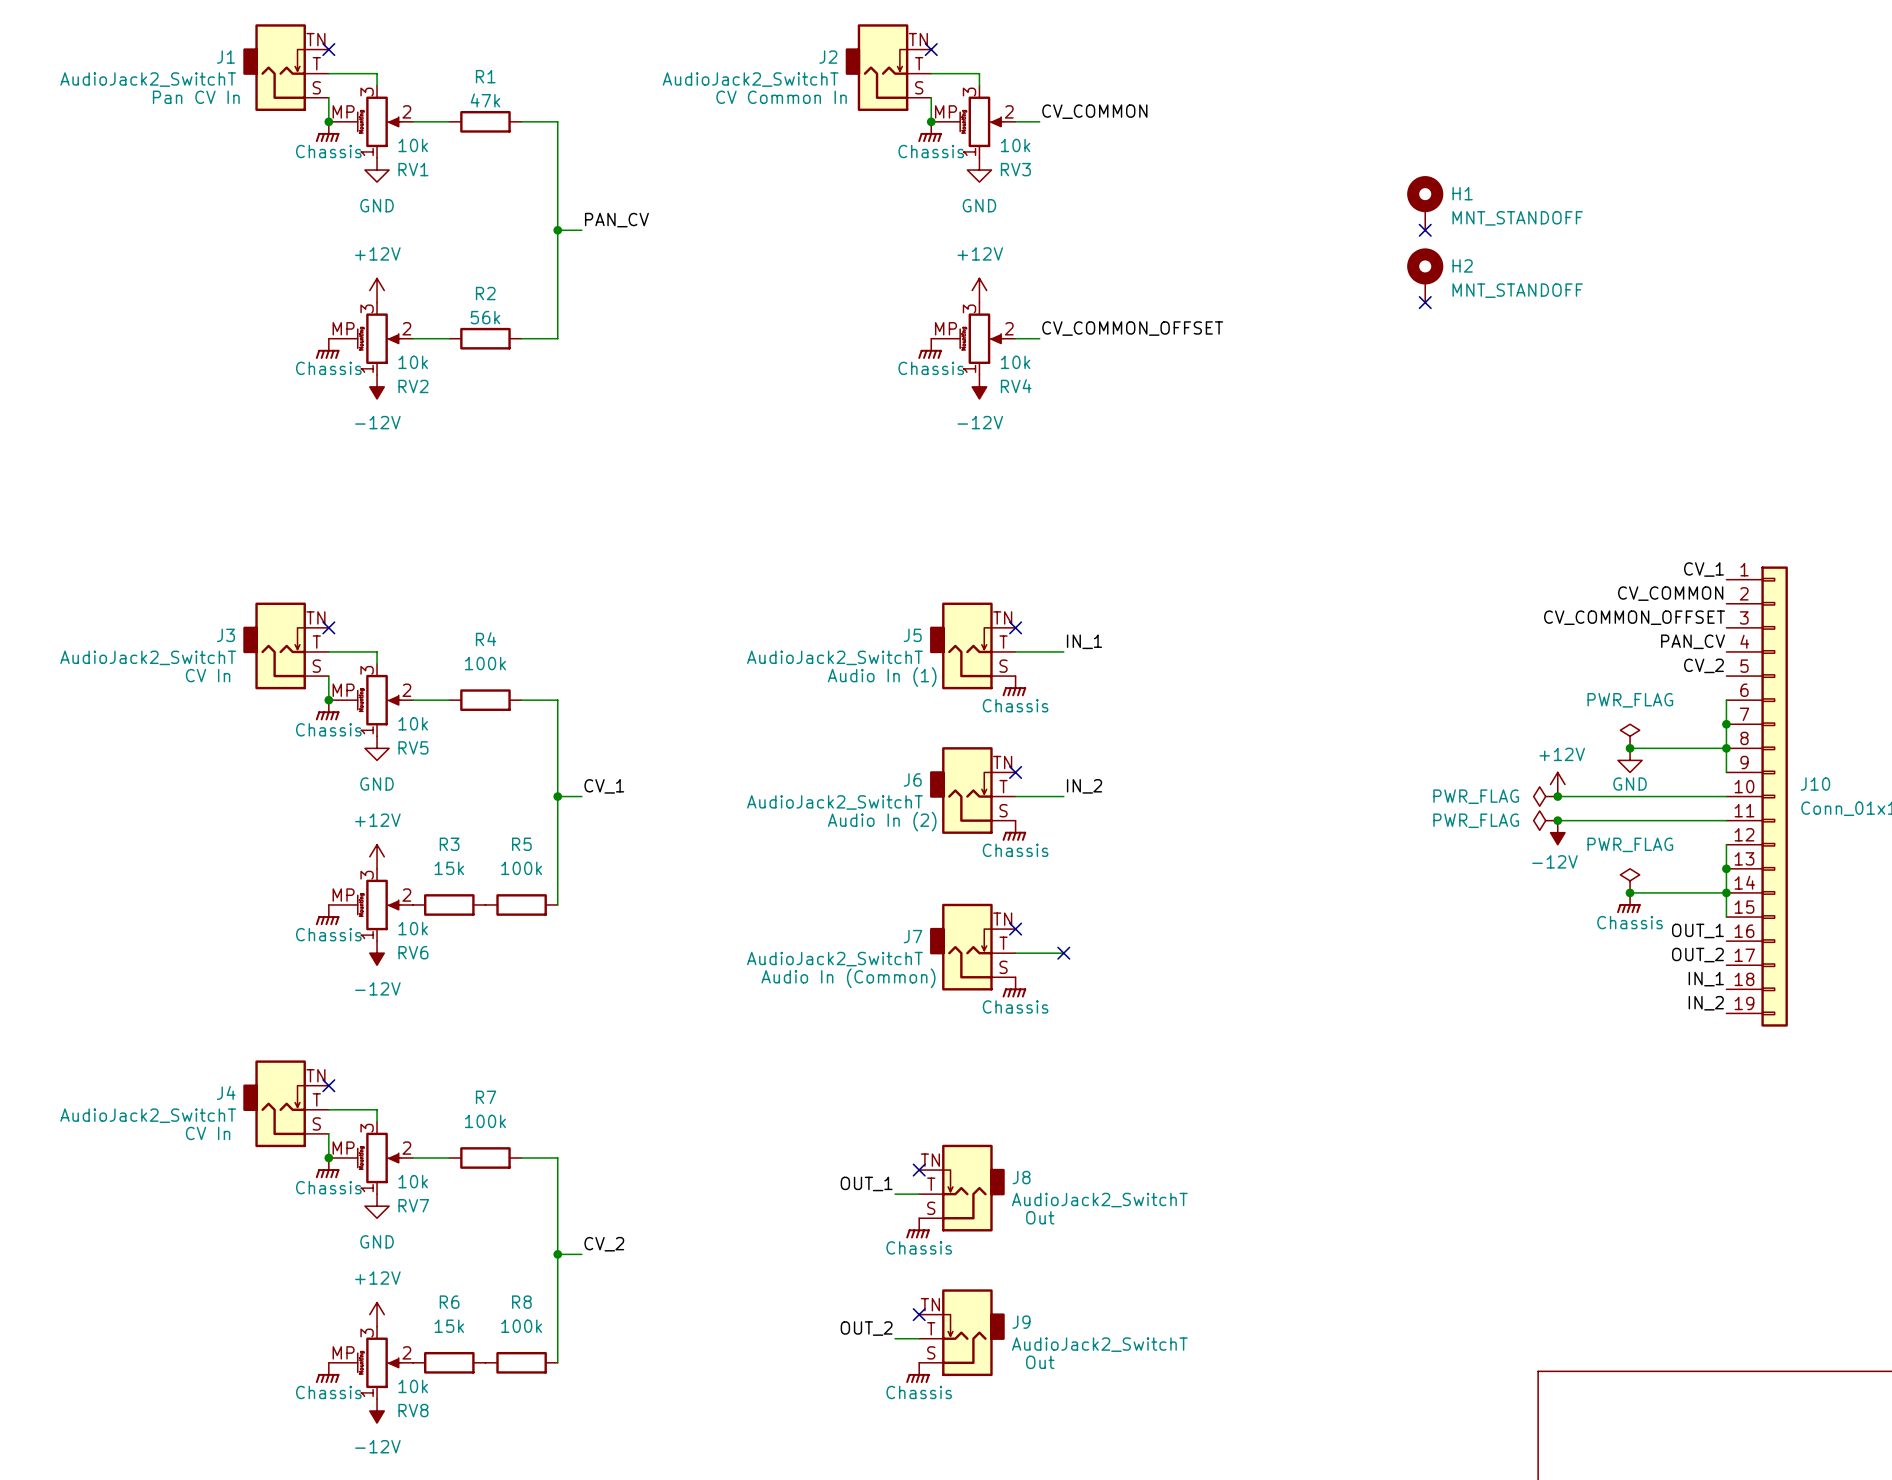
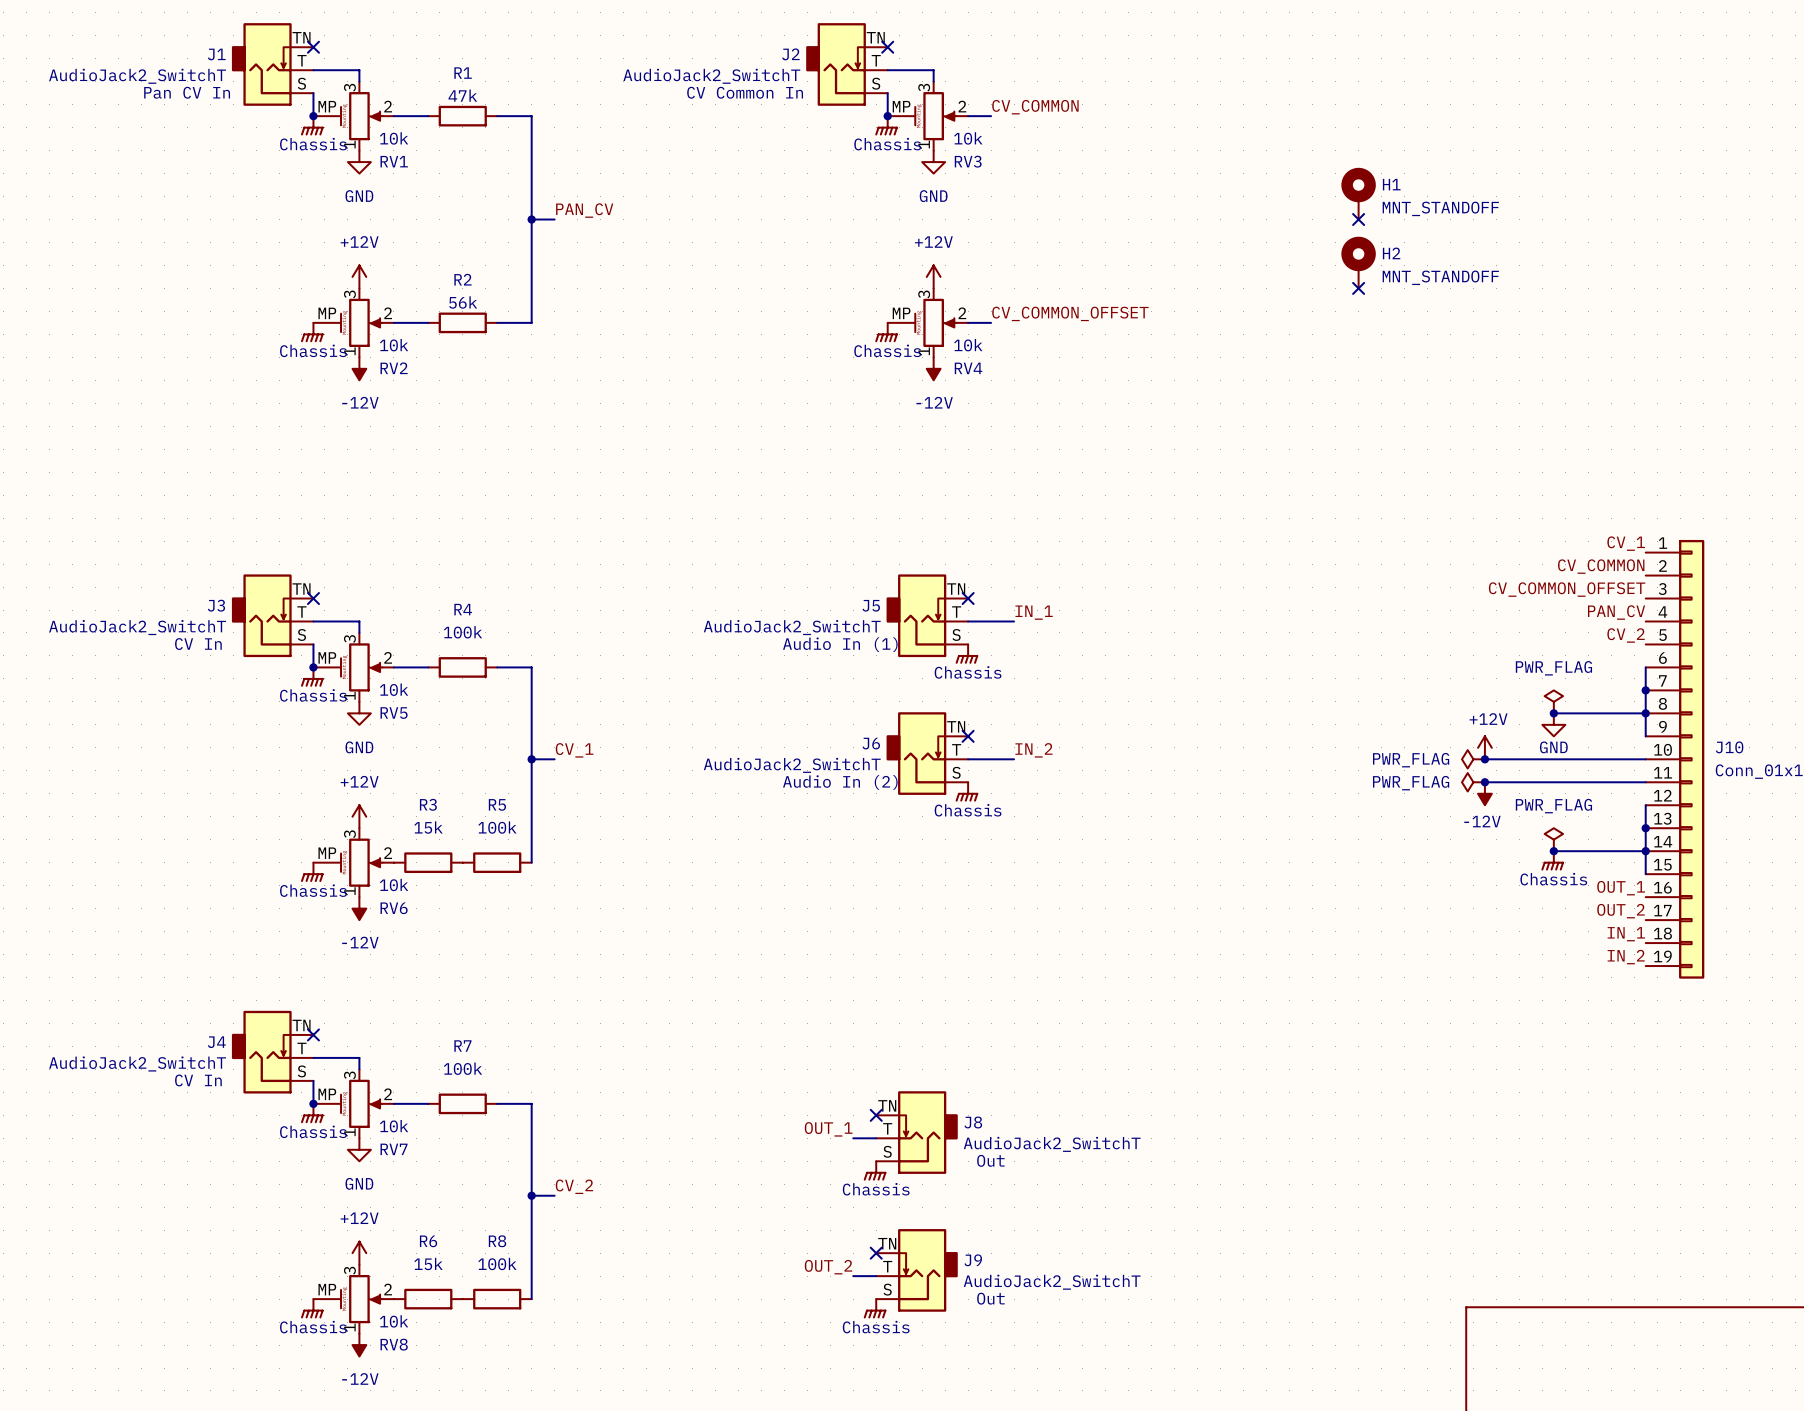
no-connect mark: (1015, 929) -> none
J7: AudioJack2_SwitchT (972, 947) -> none
wire: (1015, 953) (1063, 953) -> none
no-connect mark: (1063, 953) -> none
power symbol: Chassis (1014, 987) -> none

